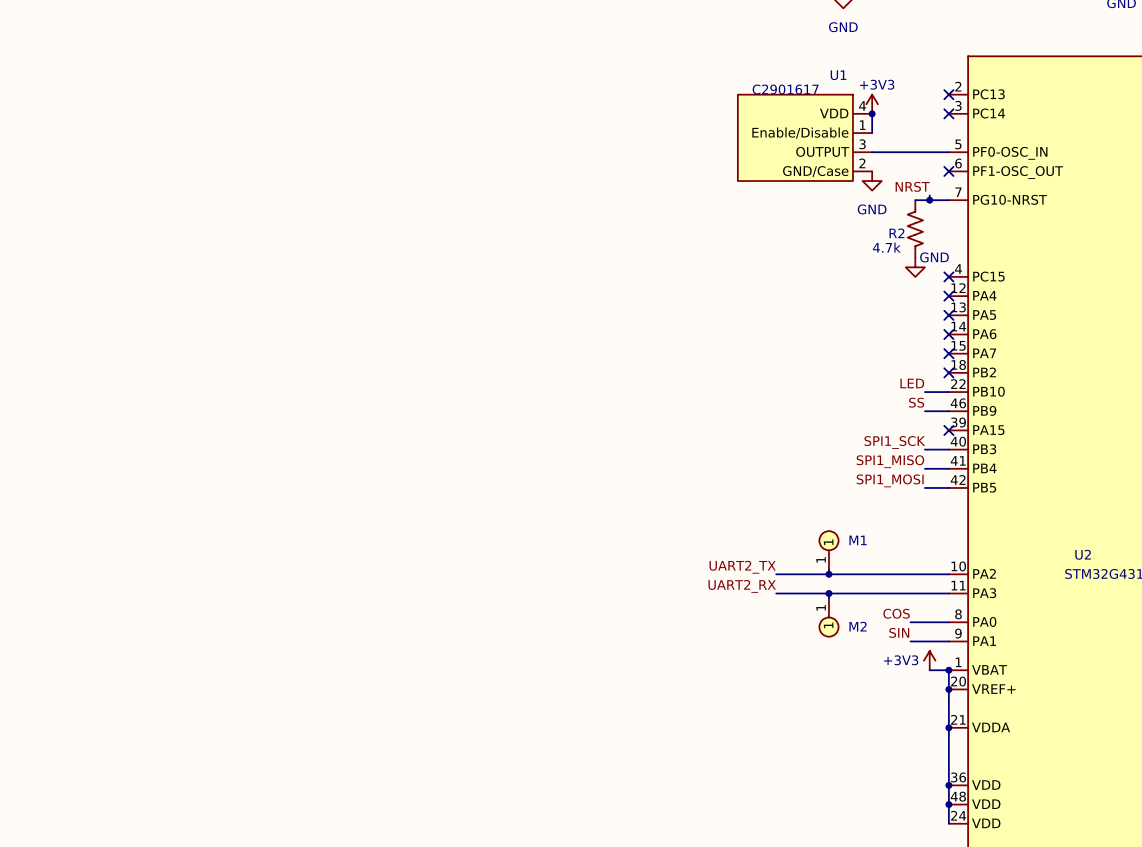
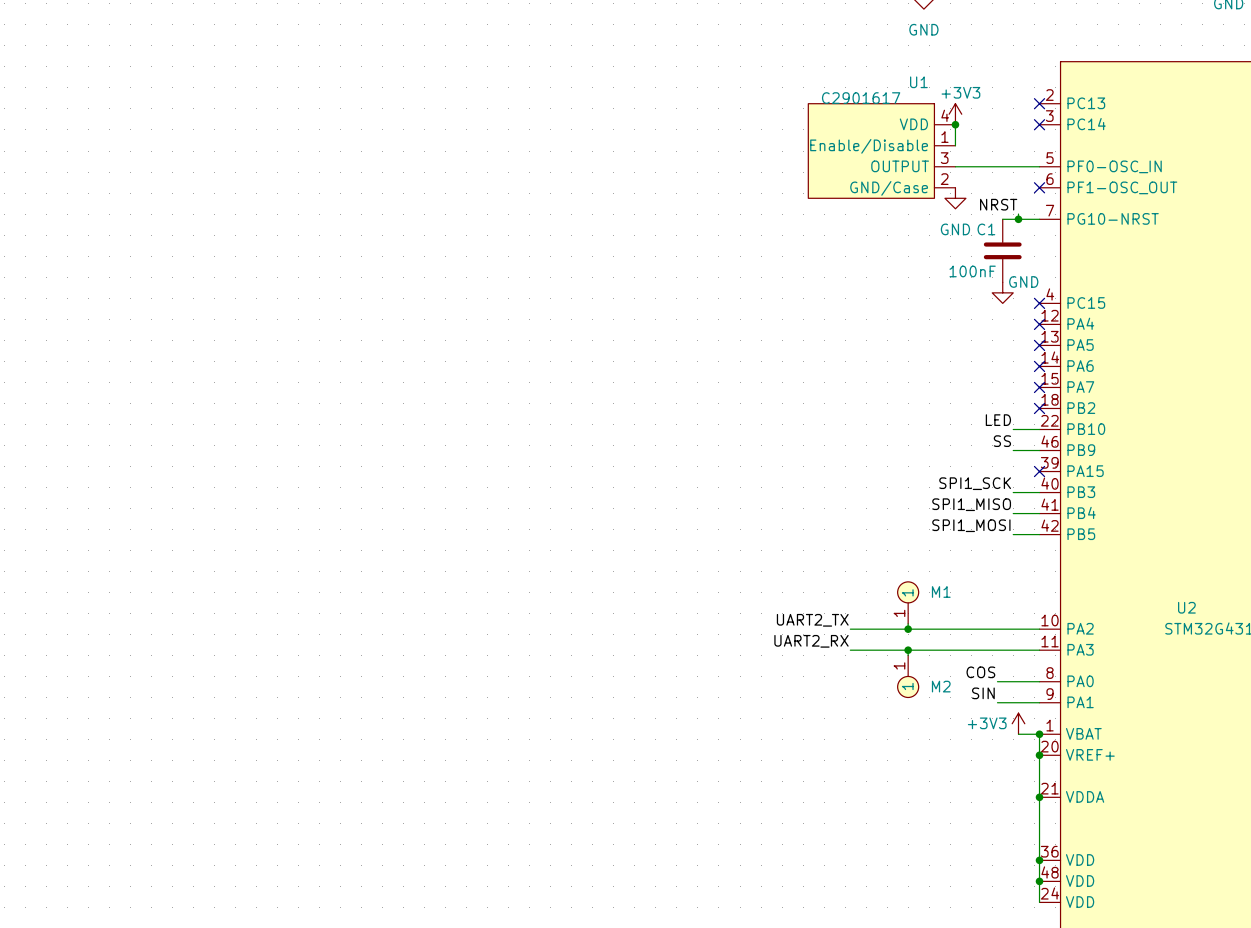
R2: 4.7k (915, 228) -> none
C1: none -> 100nF (1002, 250)

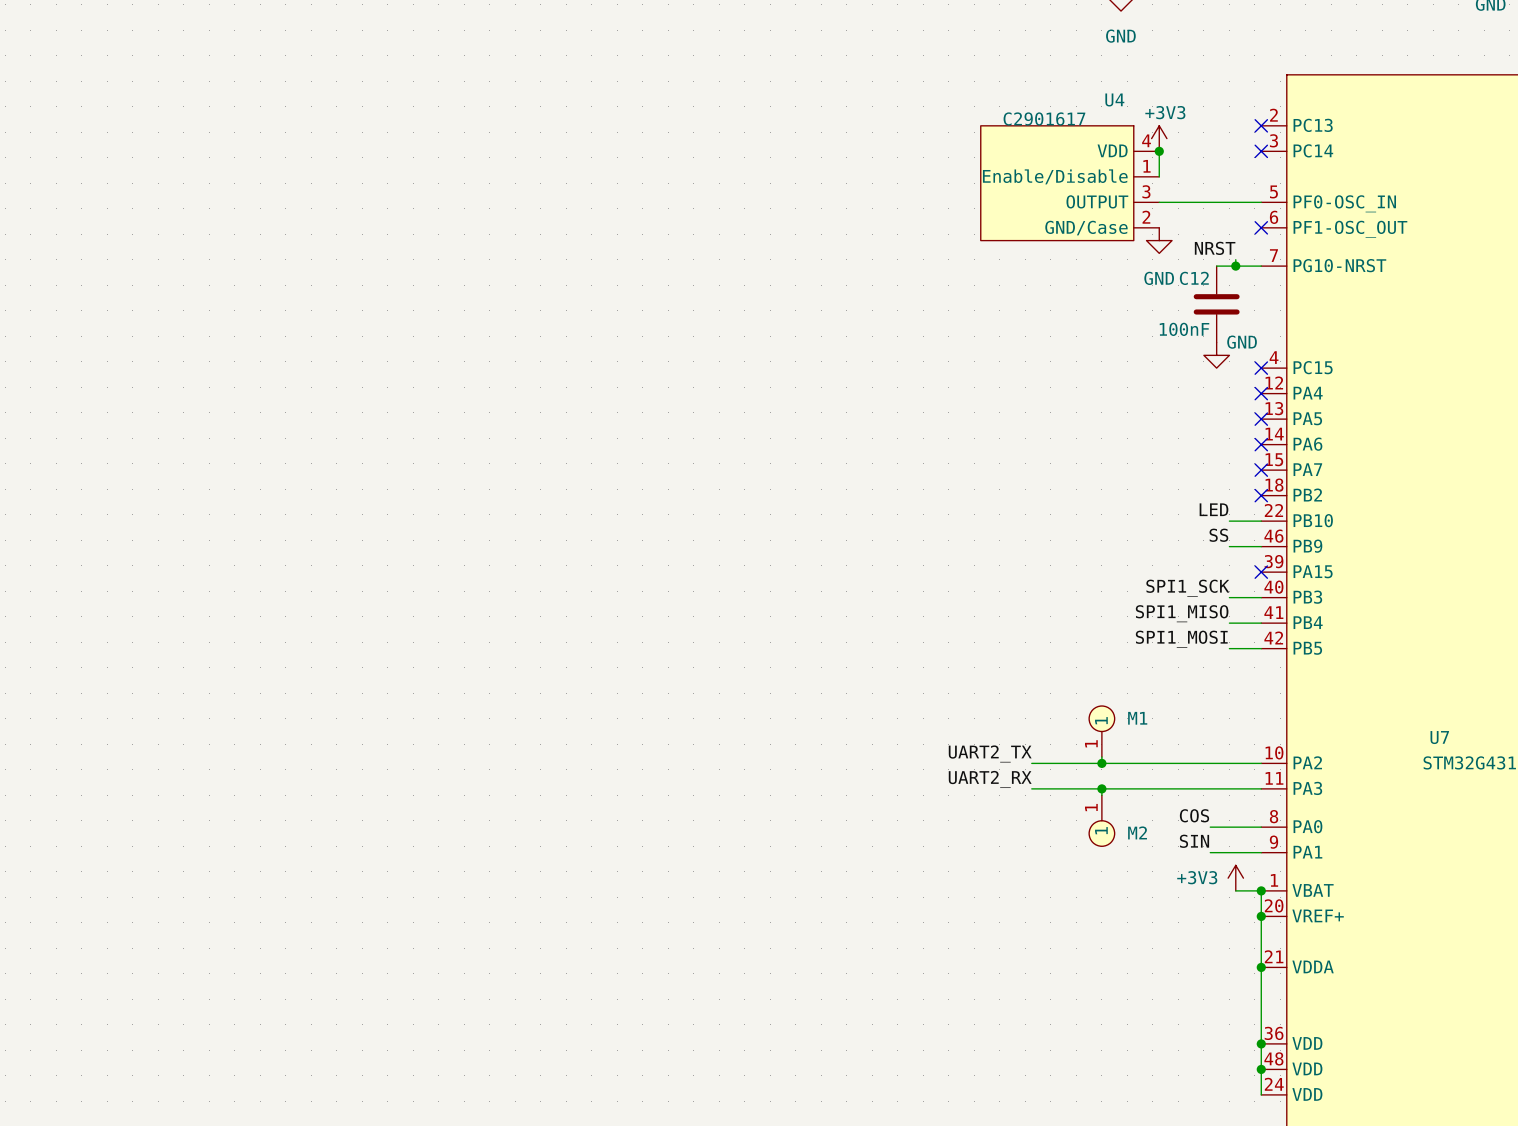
U1 name: U1 (918, 82) -> U4 (1114, 99)
C1 name: C1 (986, 229) -> C12 (1194, 278)
U2 name: U2 (1186, 607) -> U7 (1439, 737)

